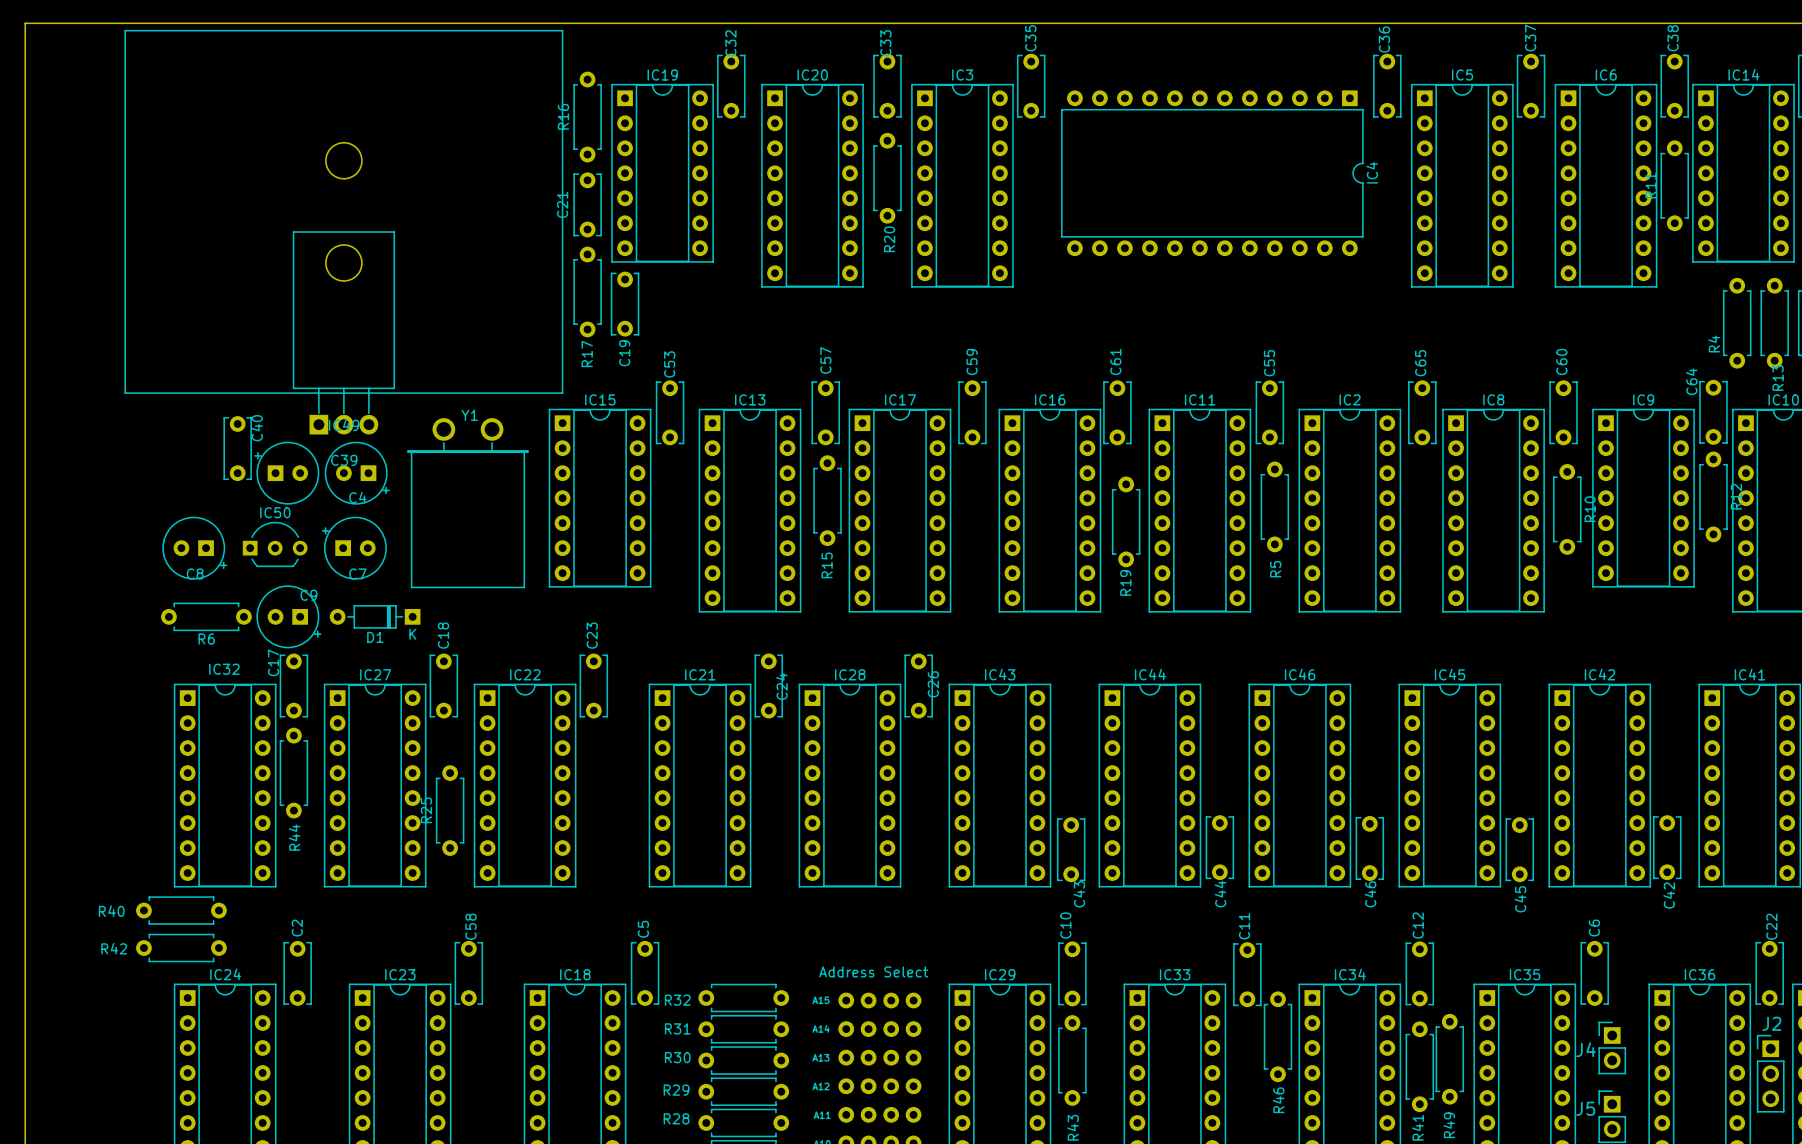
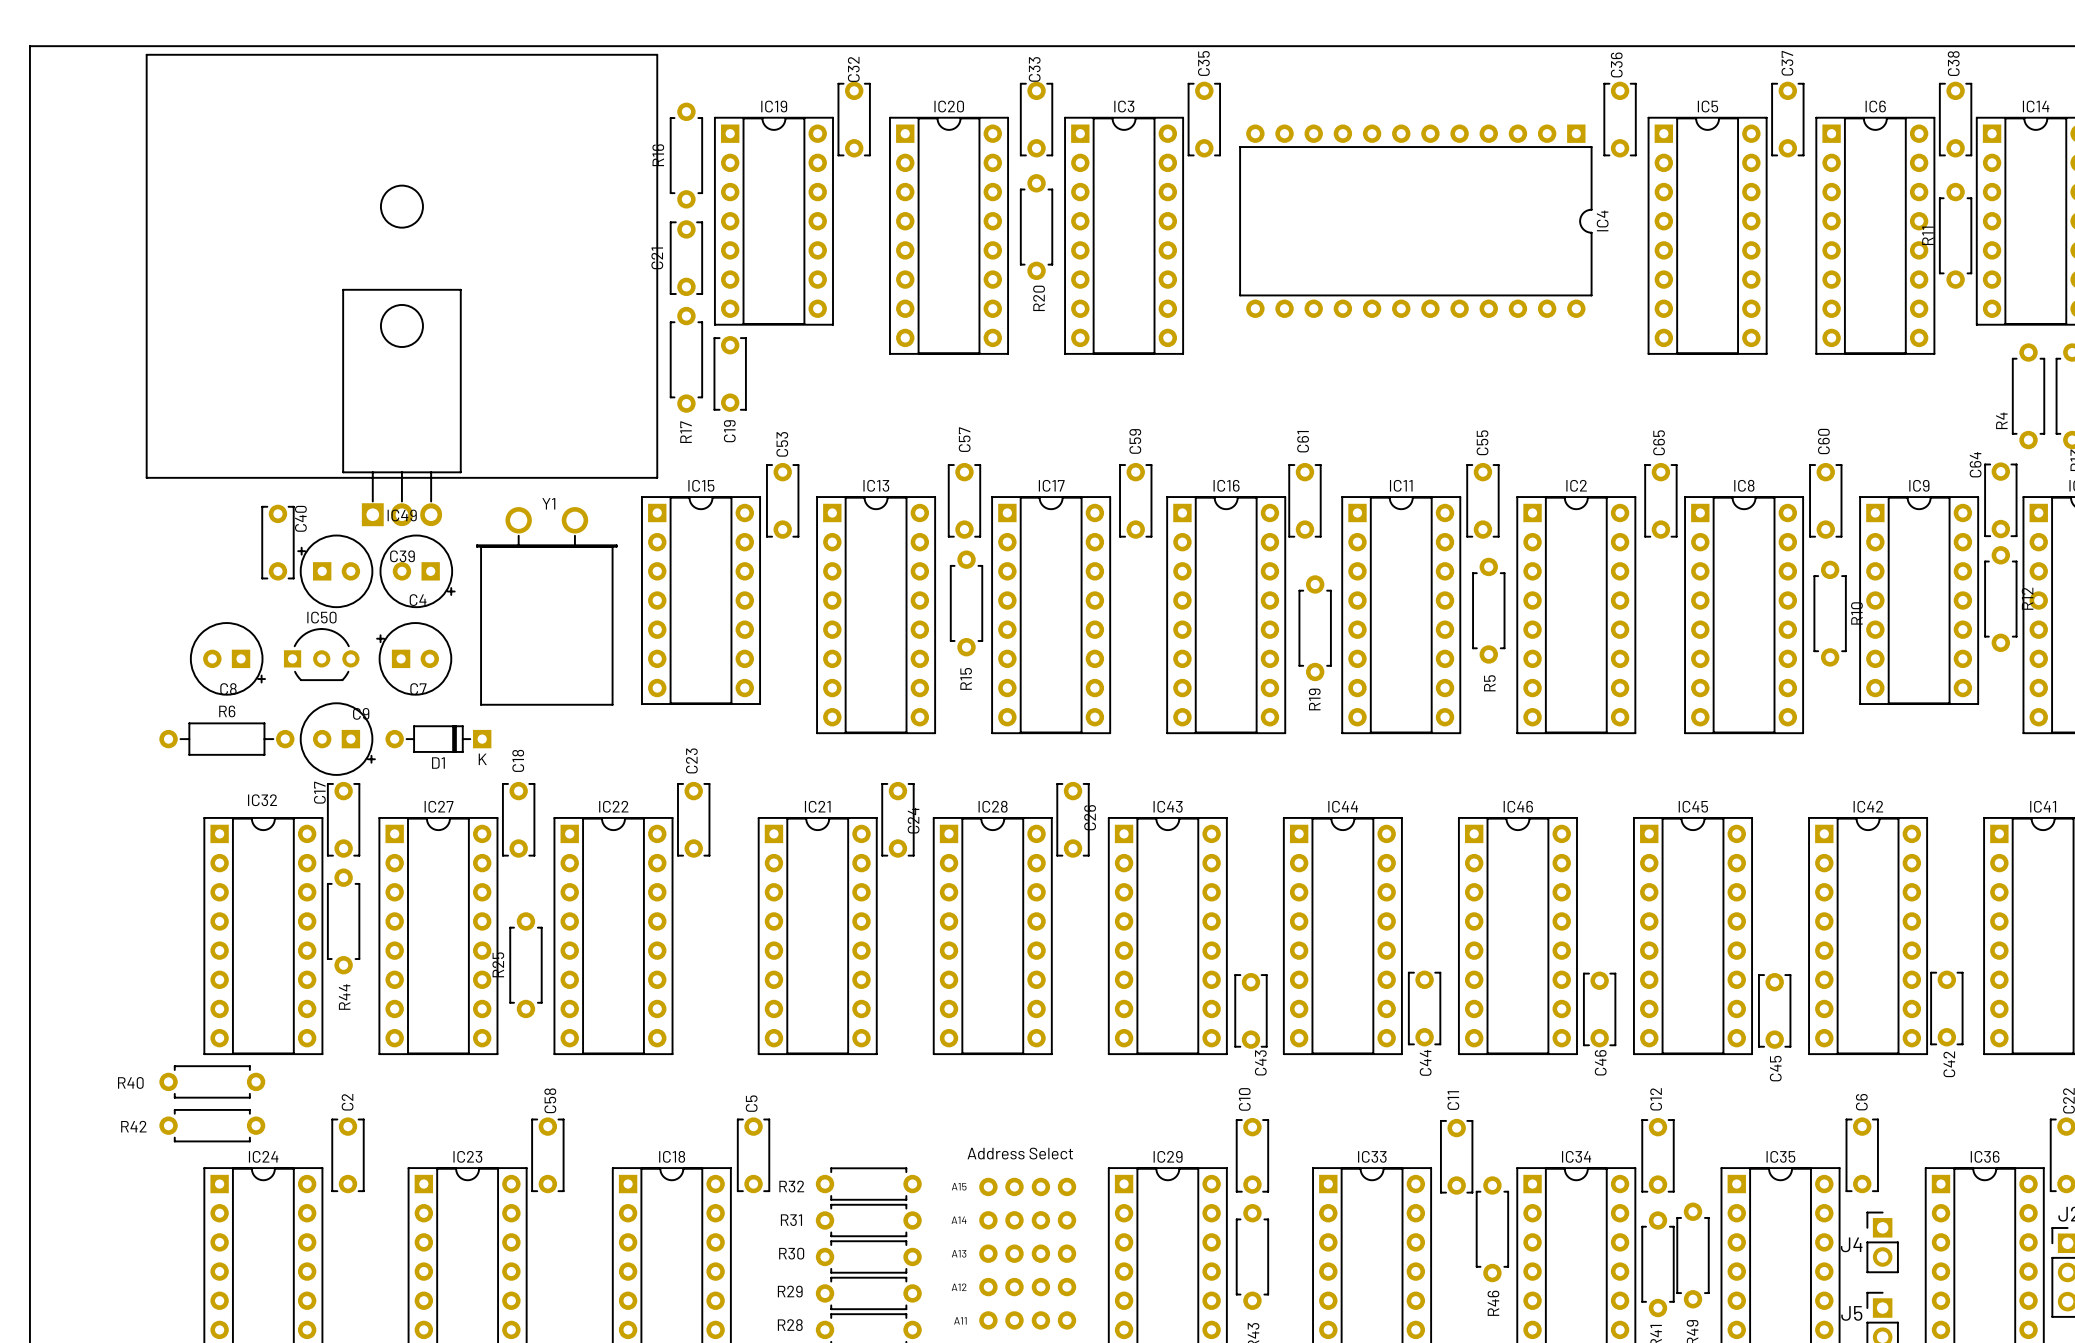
R6 footprint: [161, 602, 252, 631] -> [159, 722, 295, 756]
R6 name position: R6 (206, 639) -> R6 (227, 711)

